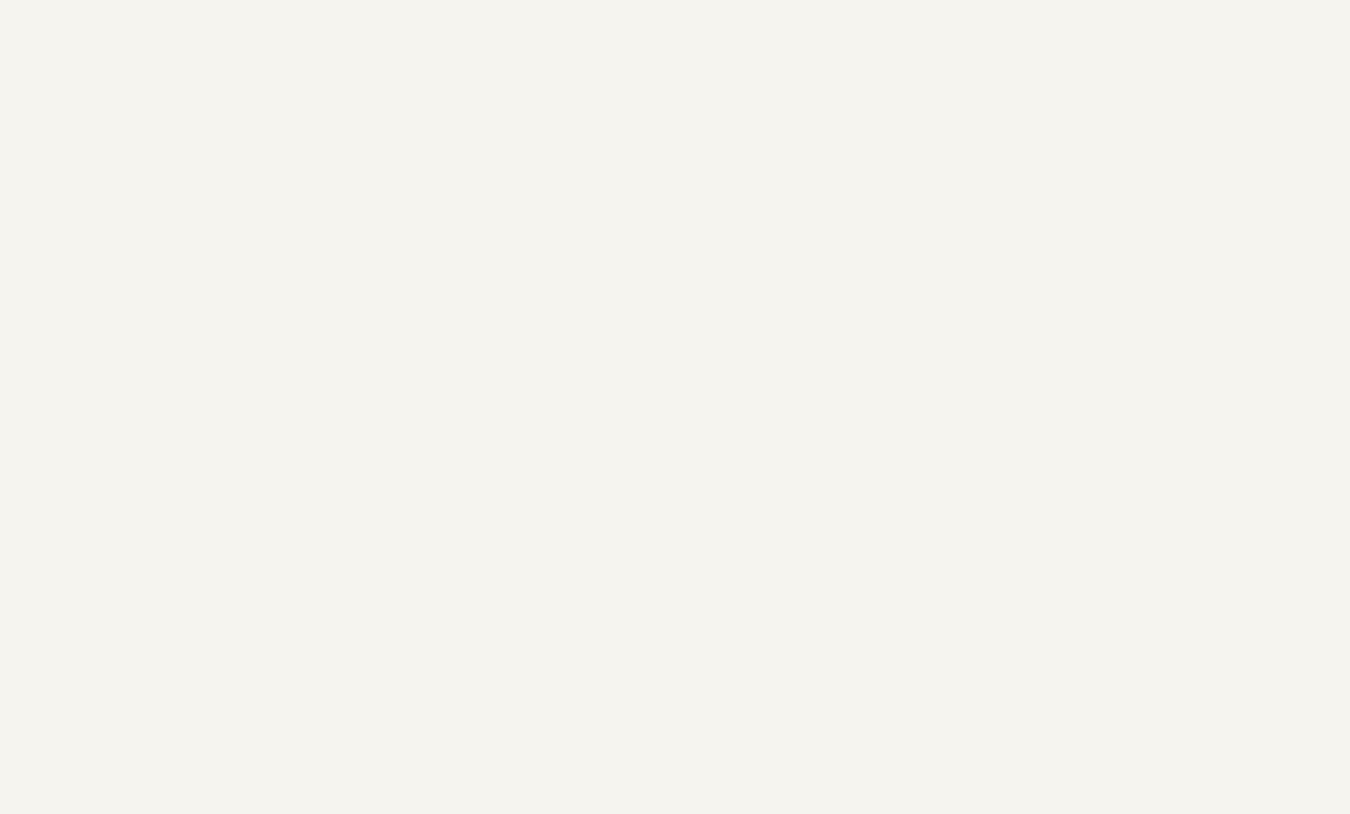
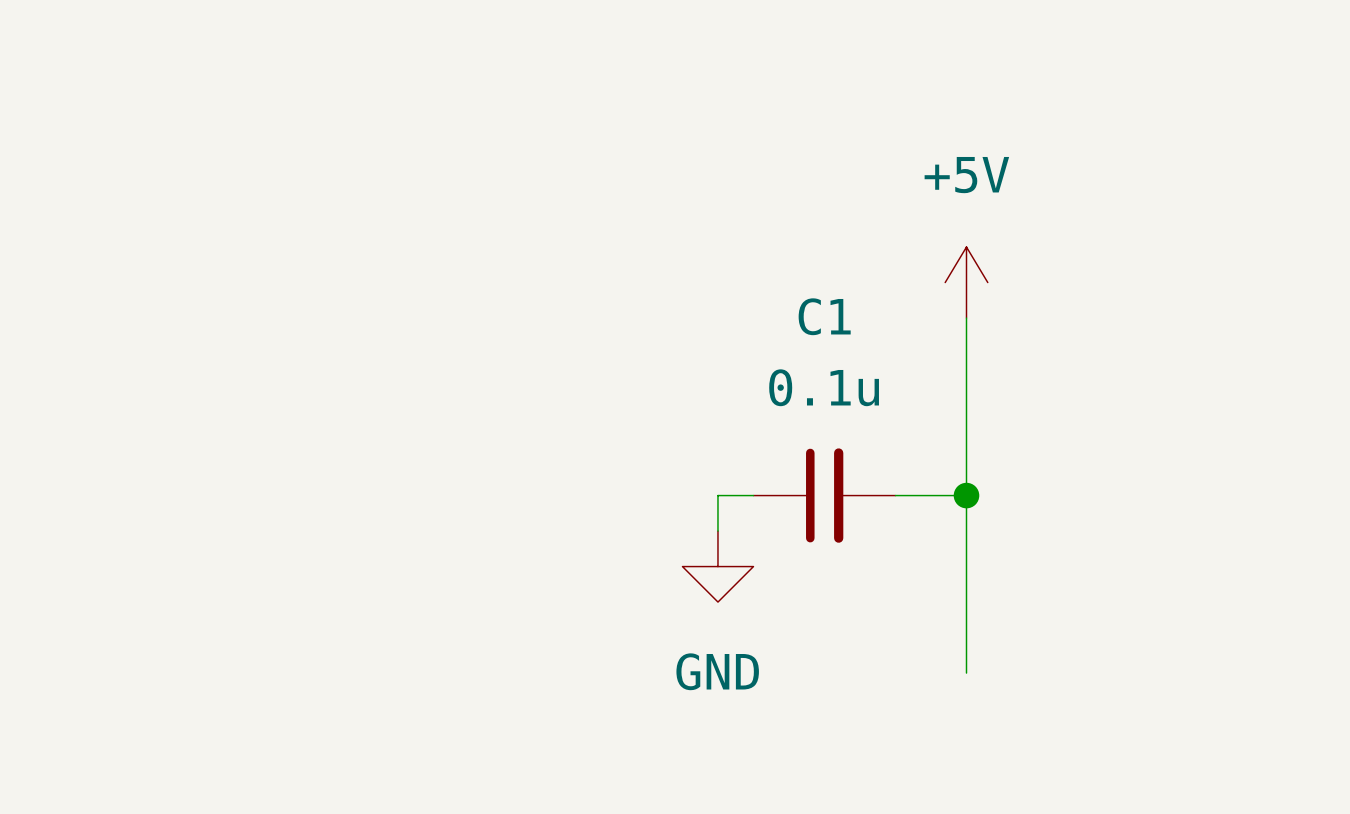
power symbol: none -> +5V (966, 282)
wire: none -> (966, 318) (966, 673)
wire: none -> (753, 495) (717, 495) (717, 531)
C1: none -> 0.1u (824, 495)
wire: none -> (895, 495) (966, 495)
junction: none -> (966, 495)
power symbol: none -> GND (717, 566)

